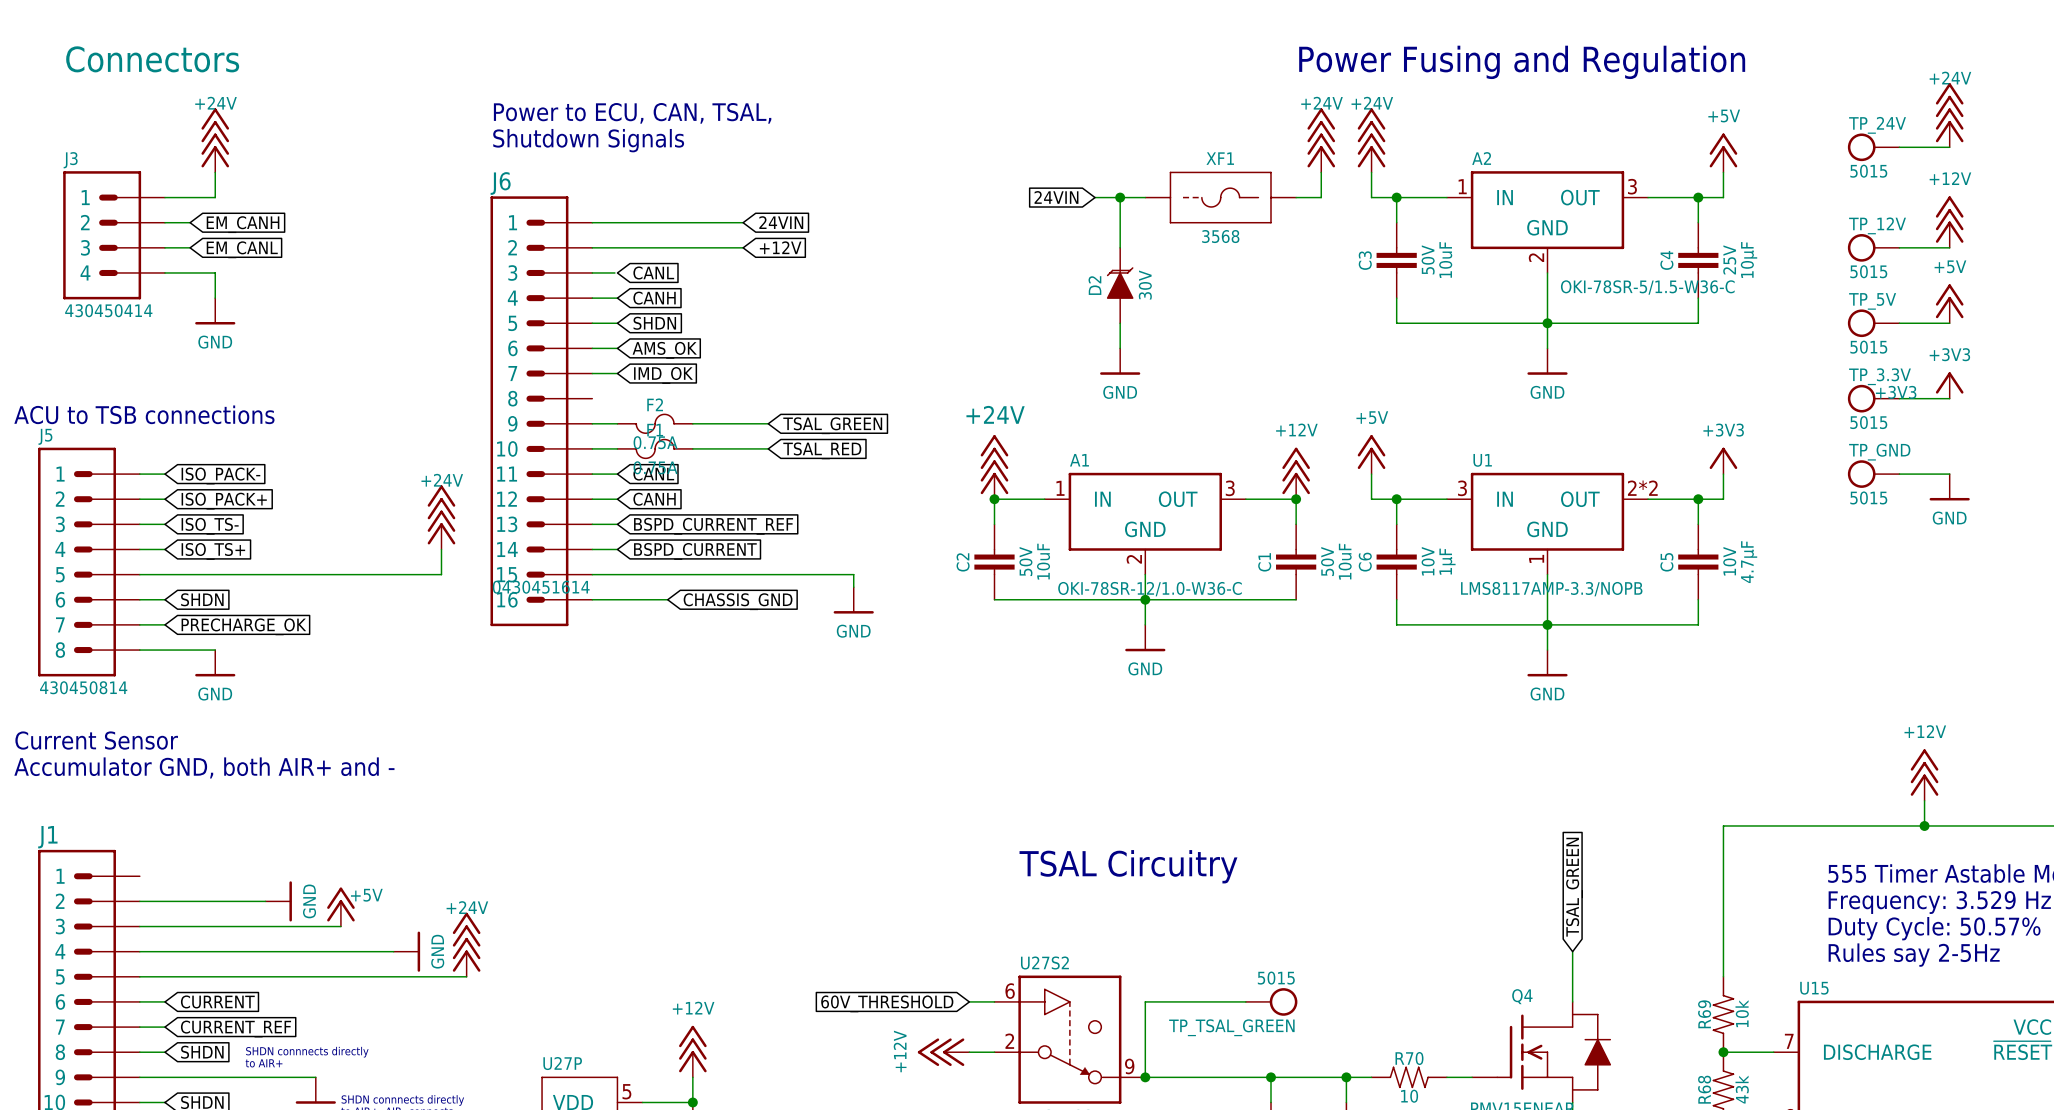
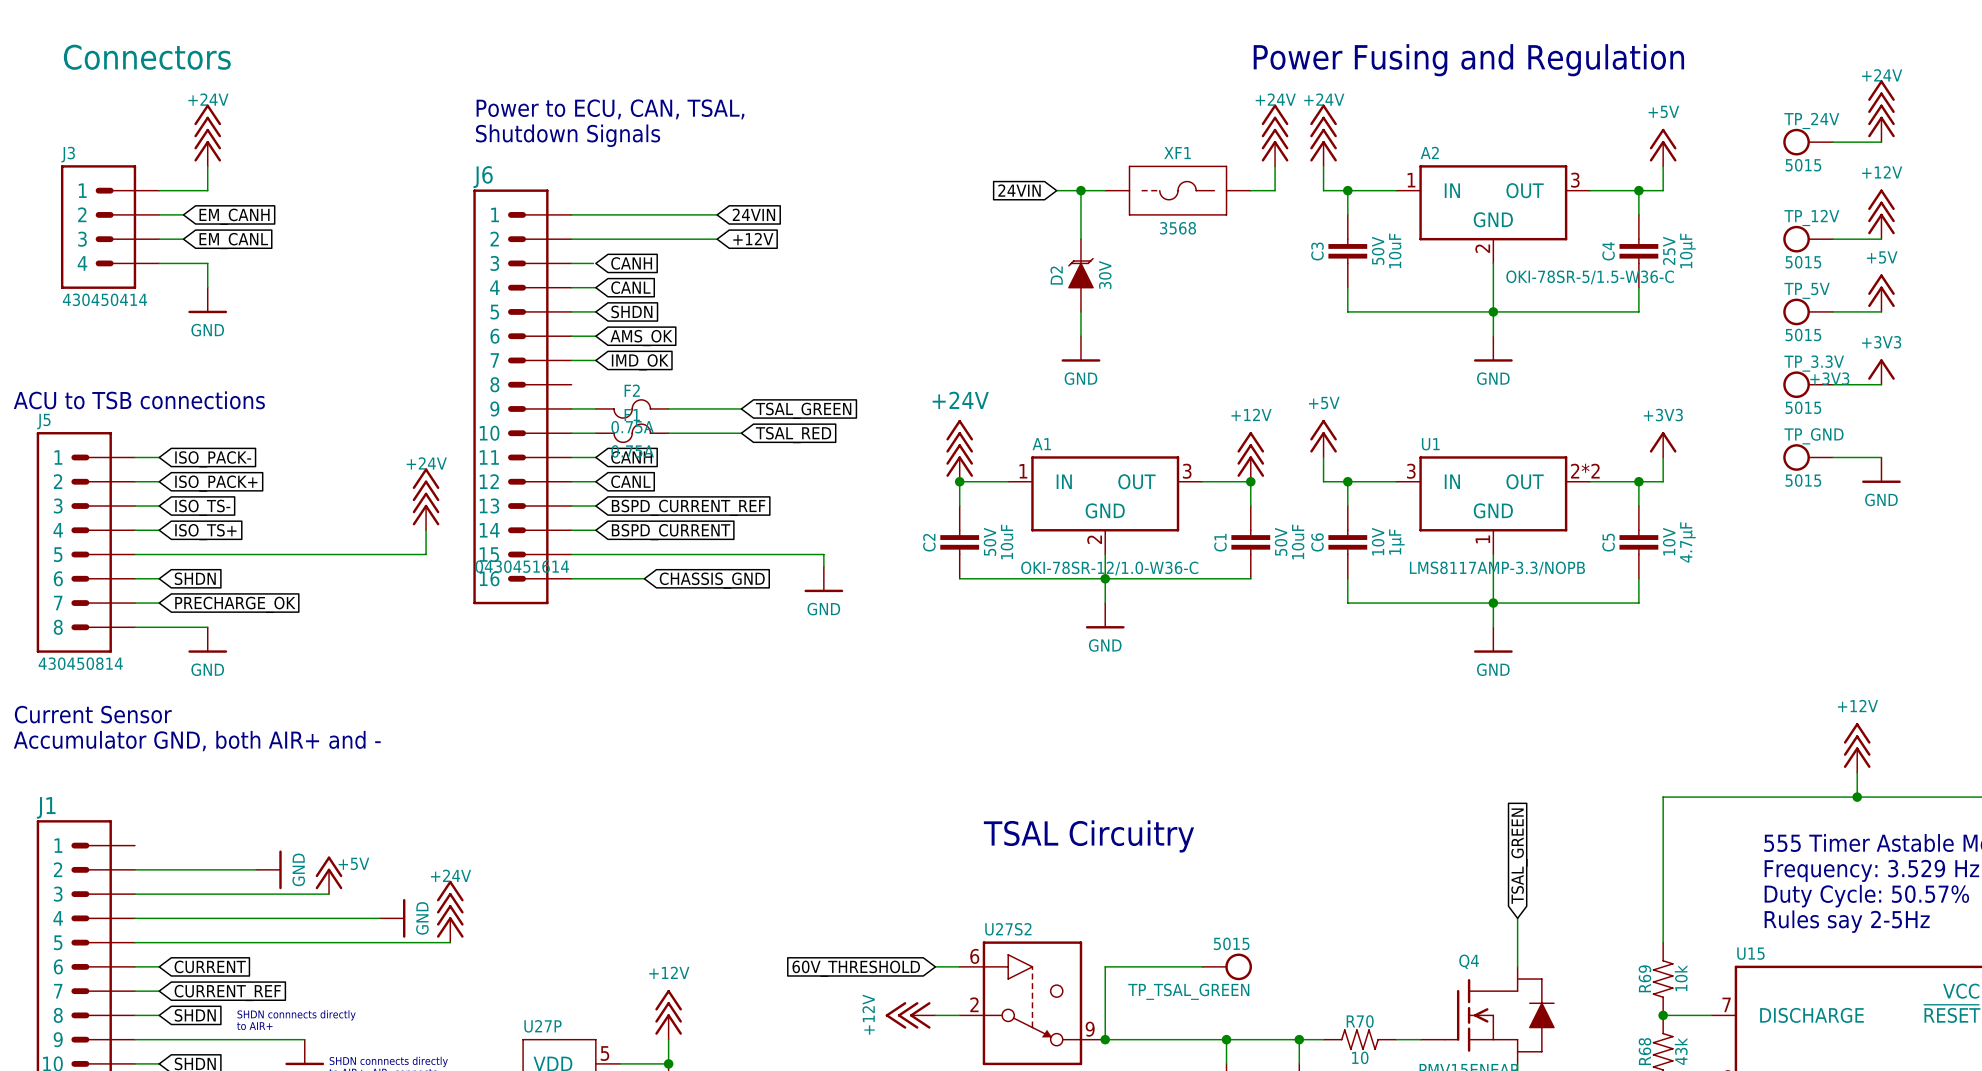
global label: CANL (653, 272) -> CANH (631, 263)
global label: CANH (654, 298) -> CANL (630, 287)
global label: CANL (653, 474) -> CANH (631, 457)
global label: CANH (654, 499) -> CANL (630, 481)

